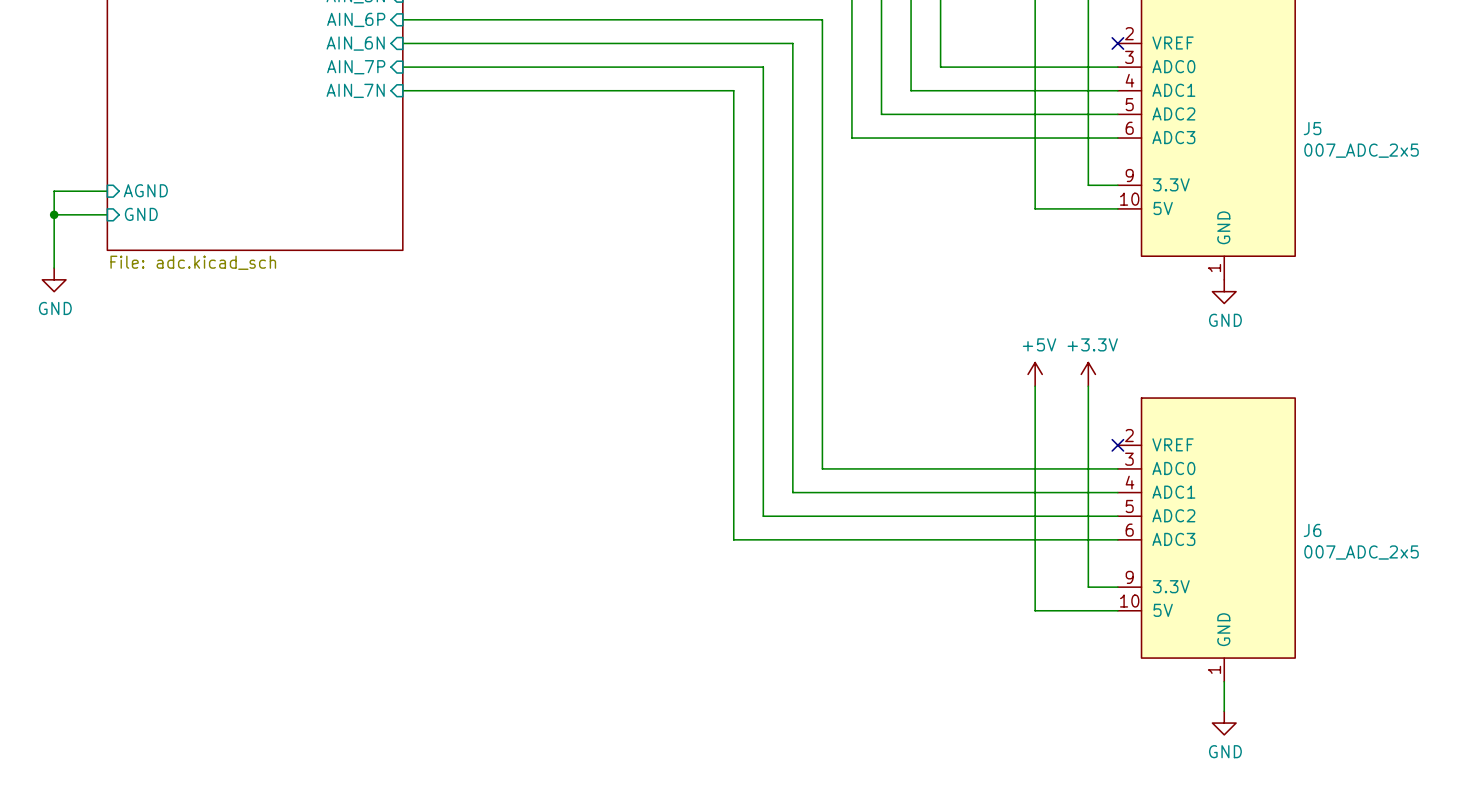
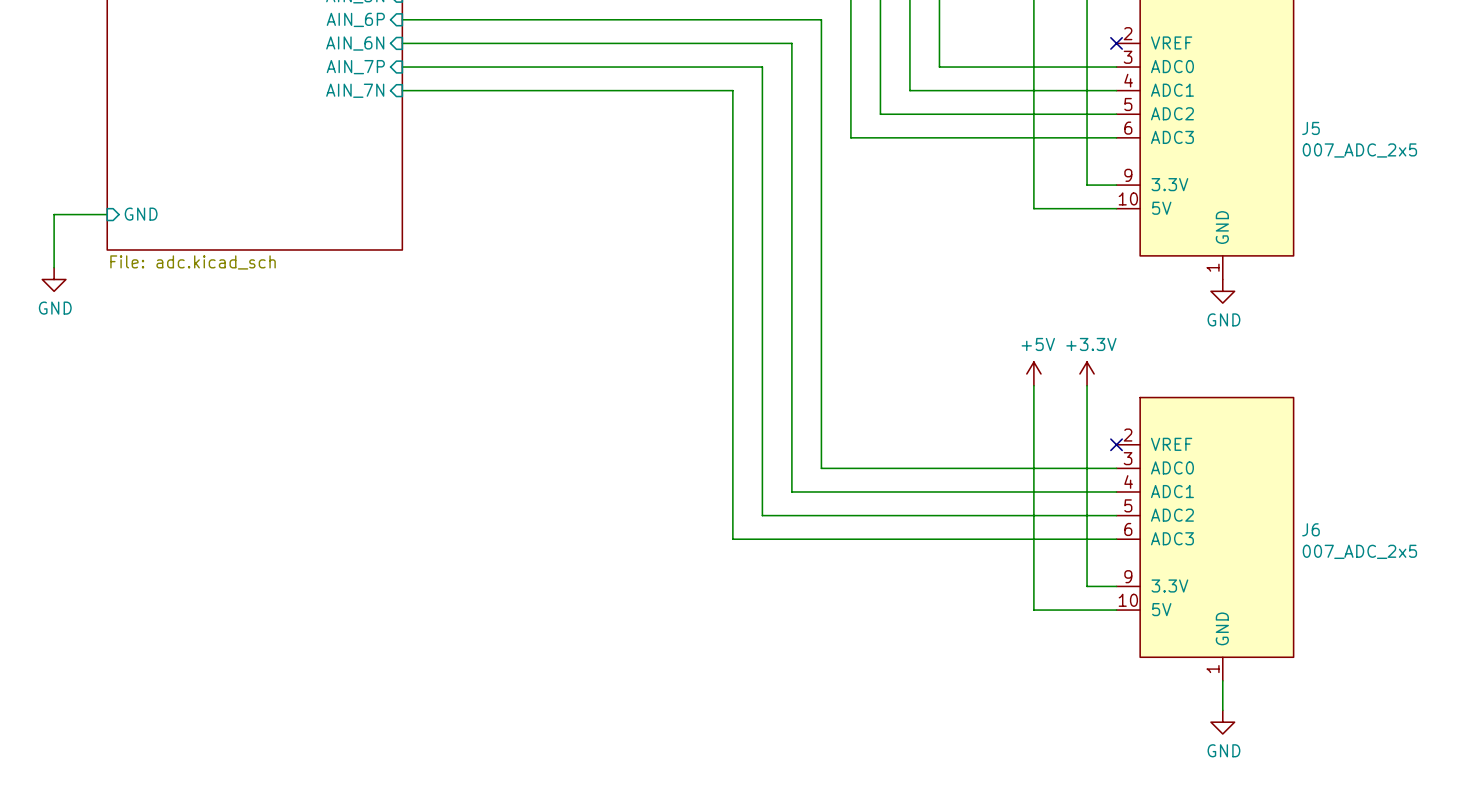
sheet pin: AGND (145, 190) -> none
wire: (107, 191) (54, 191) (54, 214) -> none
junction: (54, 214) -> none

